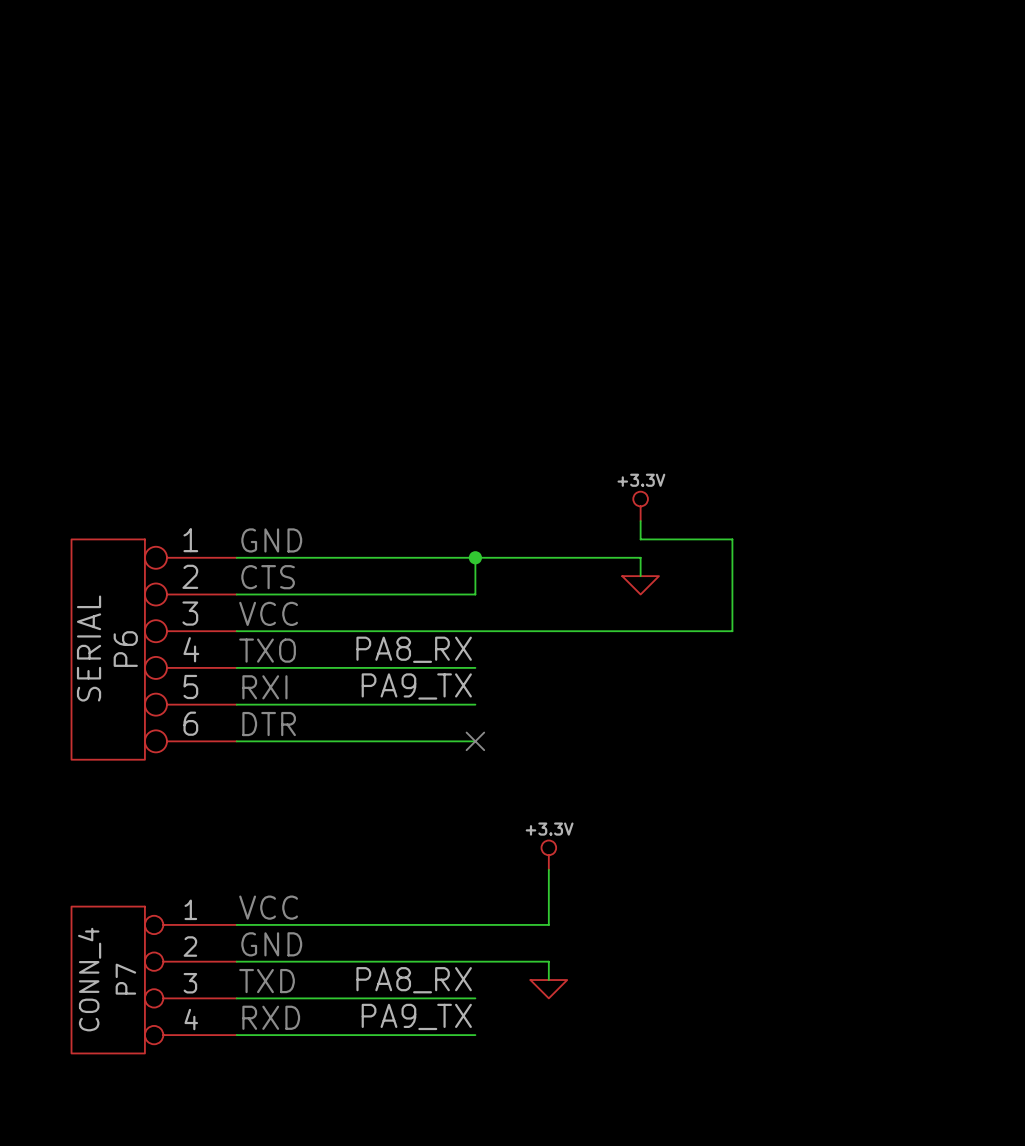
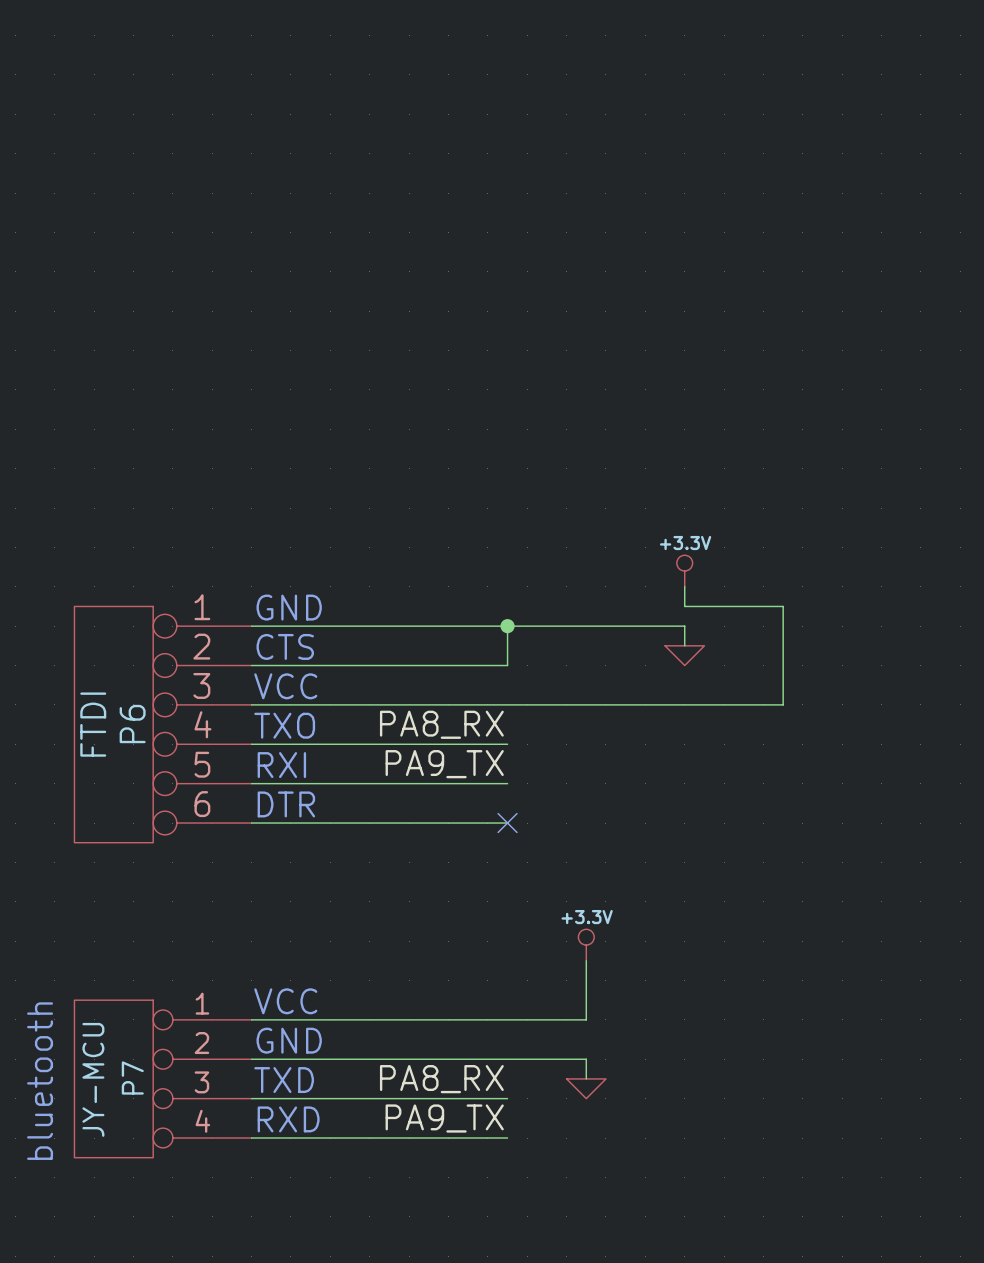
P6 value: SERIAL (89, 648) -> FTDI (93, 724)
P7 value: CONN_4 (89, 979) -> JY-MCU (93, 1079)
text: none -> bluetooth (40, 1081)

